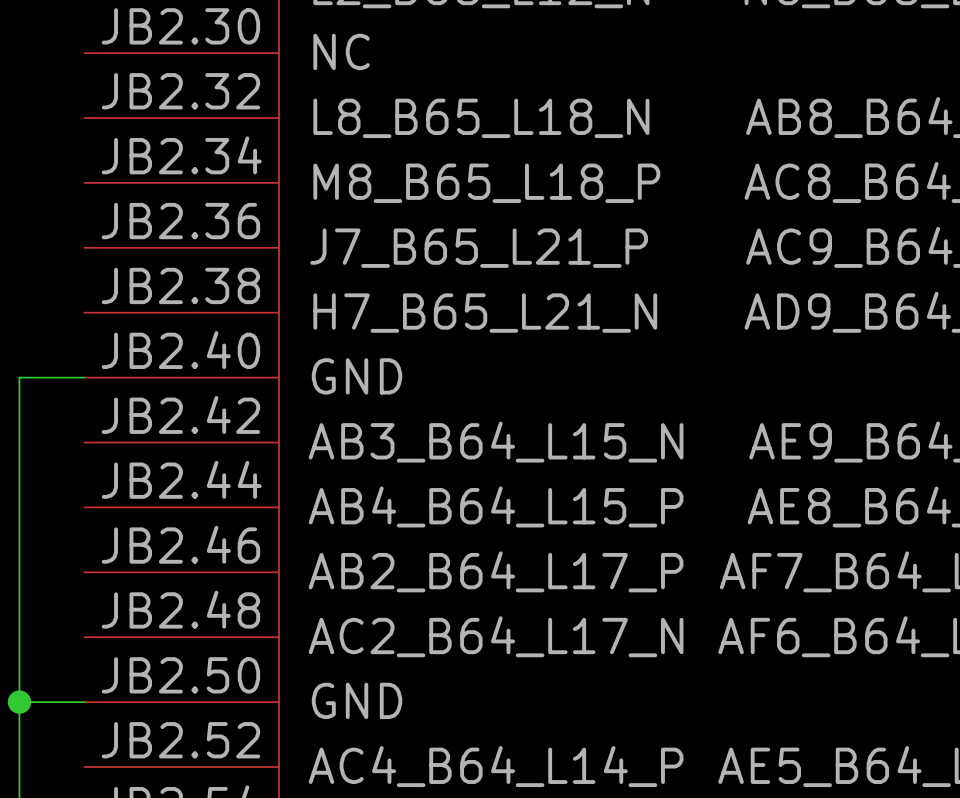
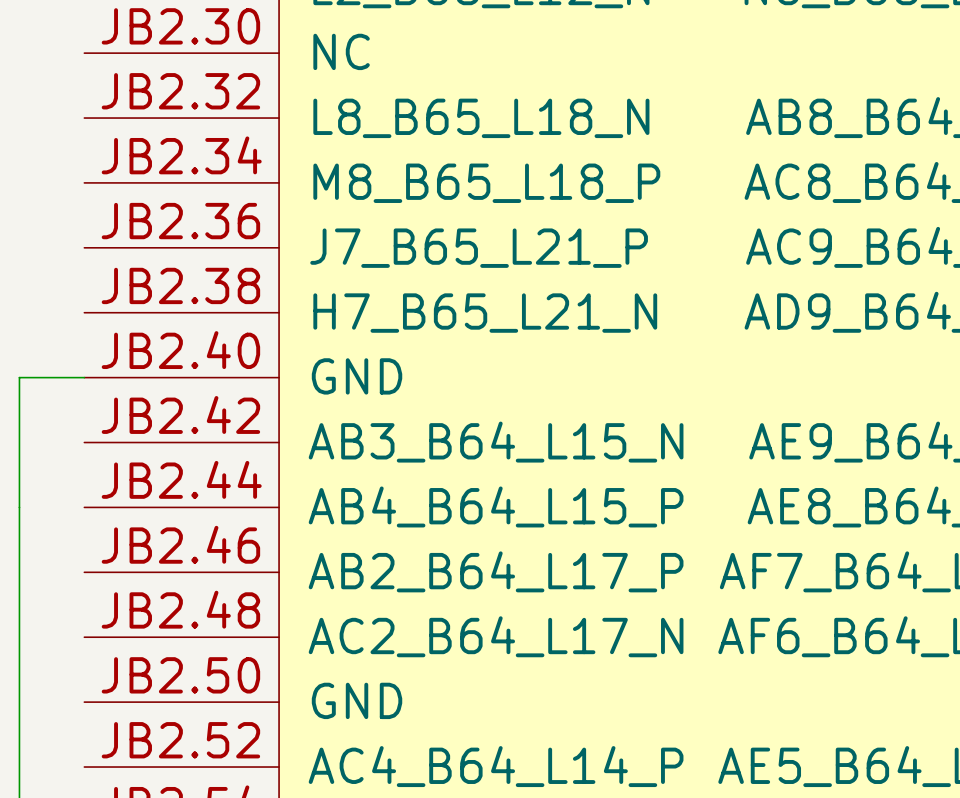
wire: (19, 702) (84, 702) -> none
junction: (19, 702) -> none

